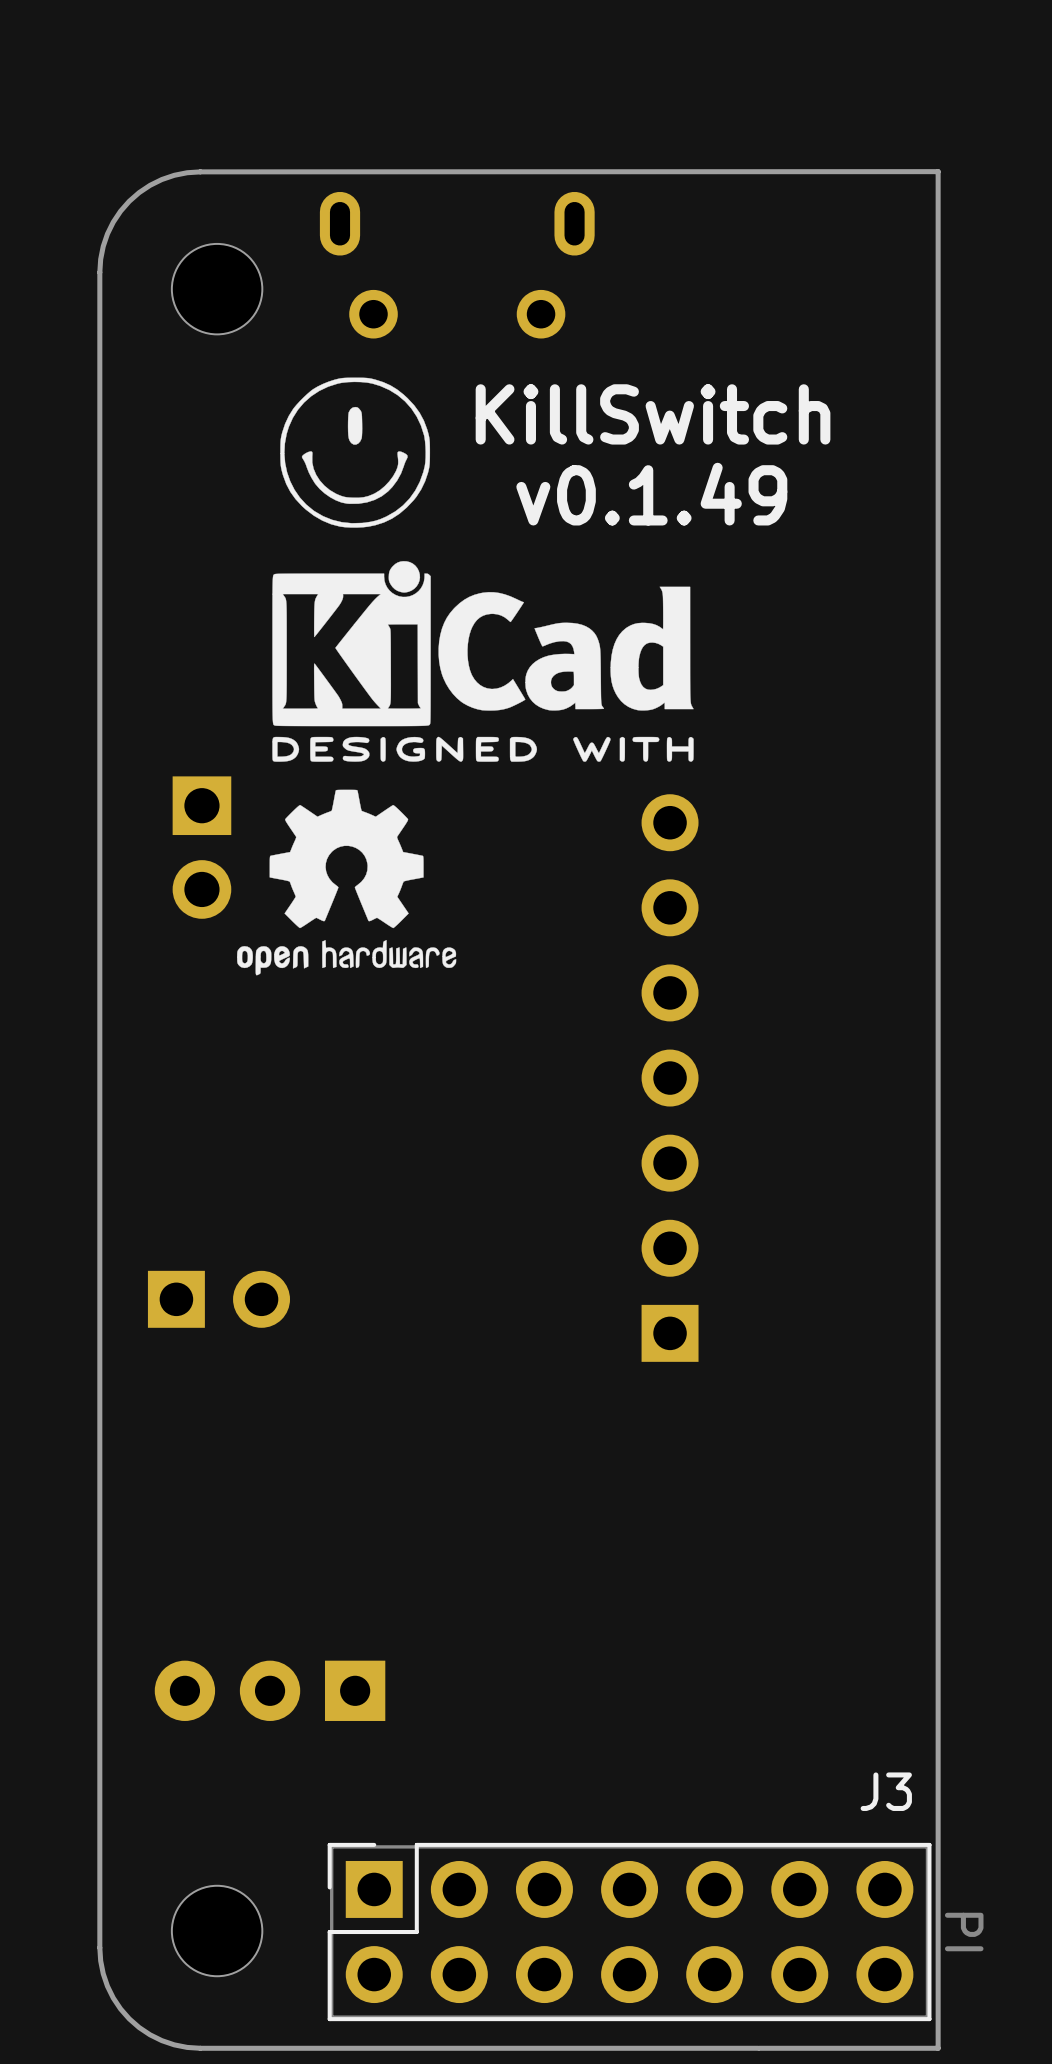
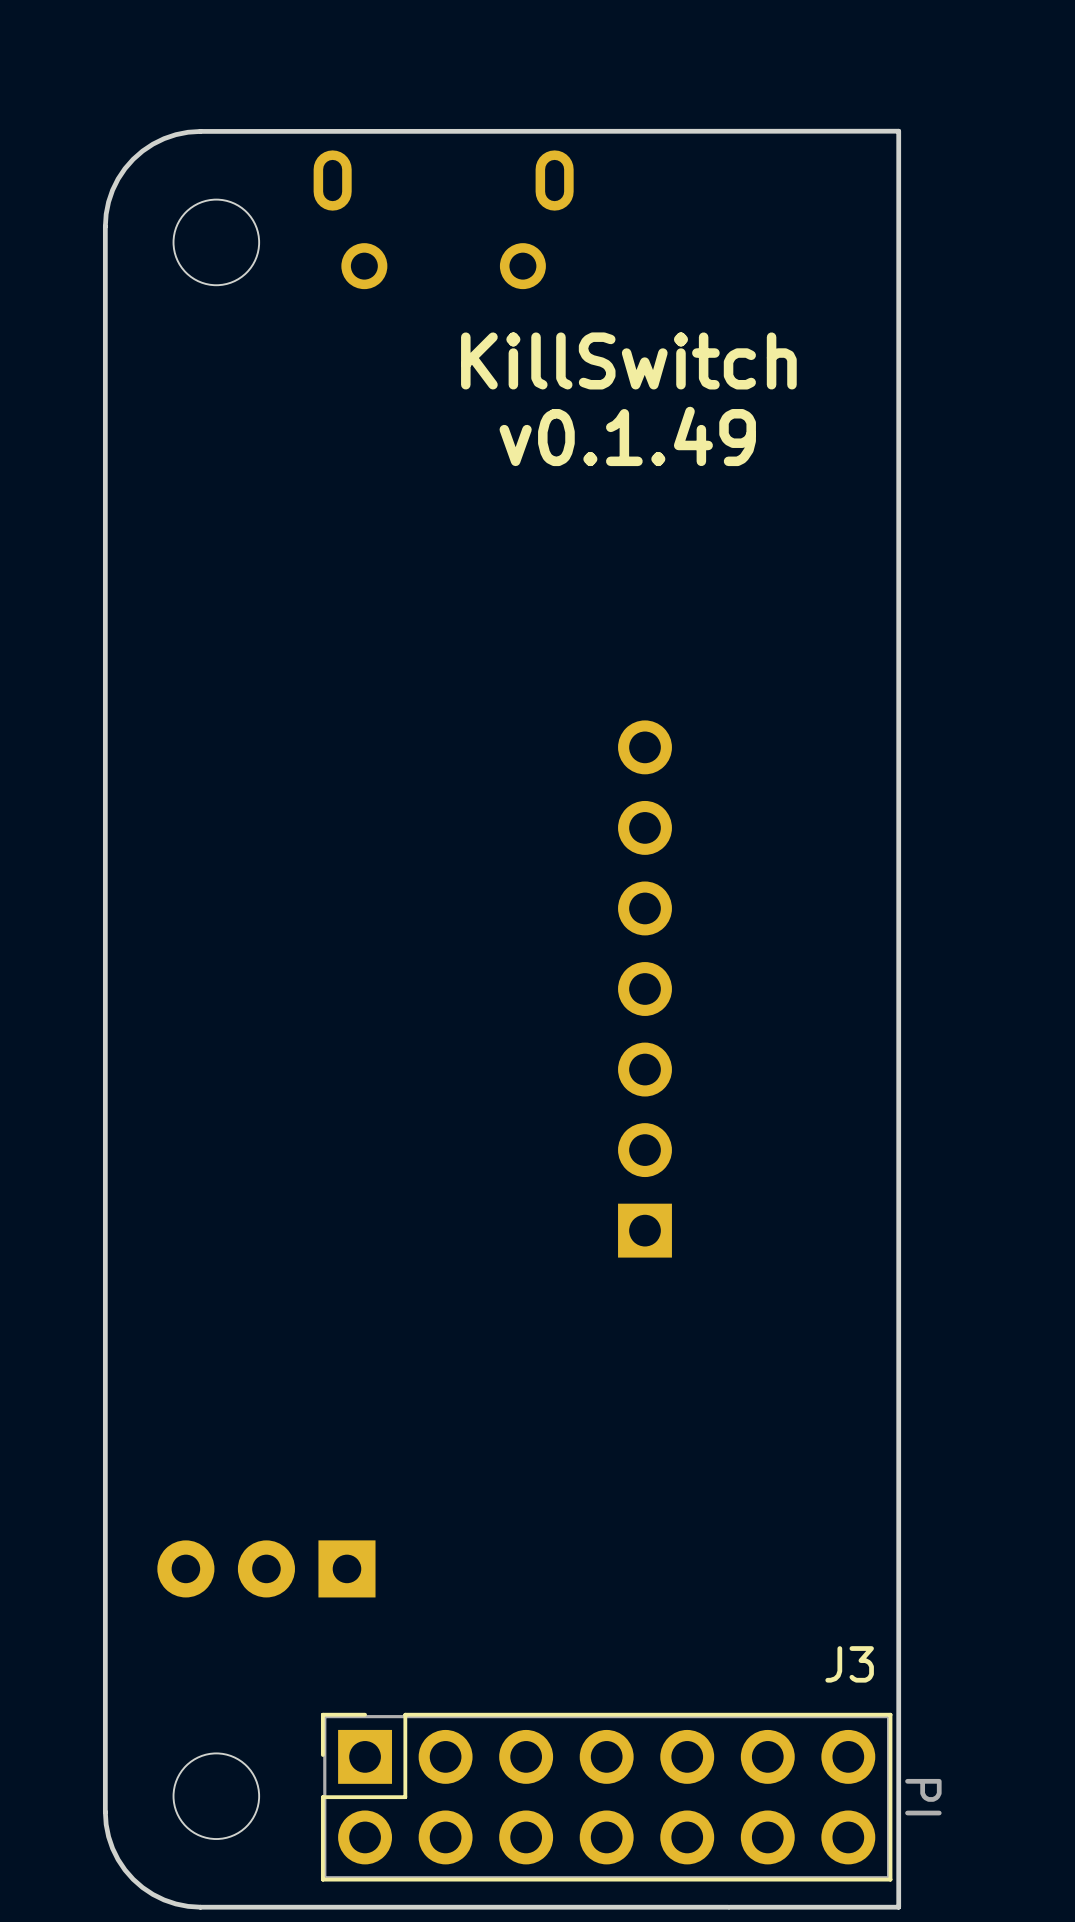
drawing: [237, 377, 694, 976] -> none
part: (201, 847) -> none
part: (218, 1299) -> none

